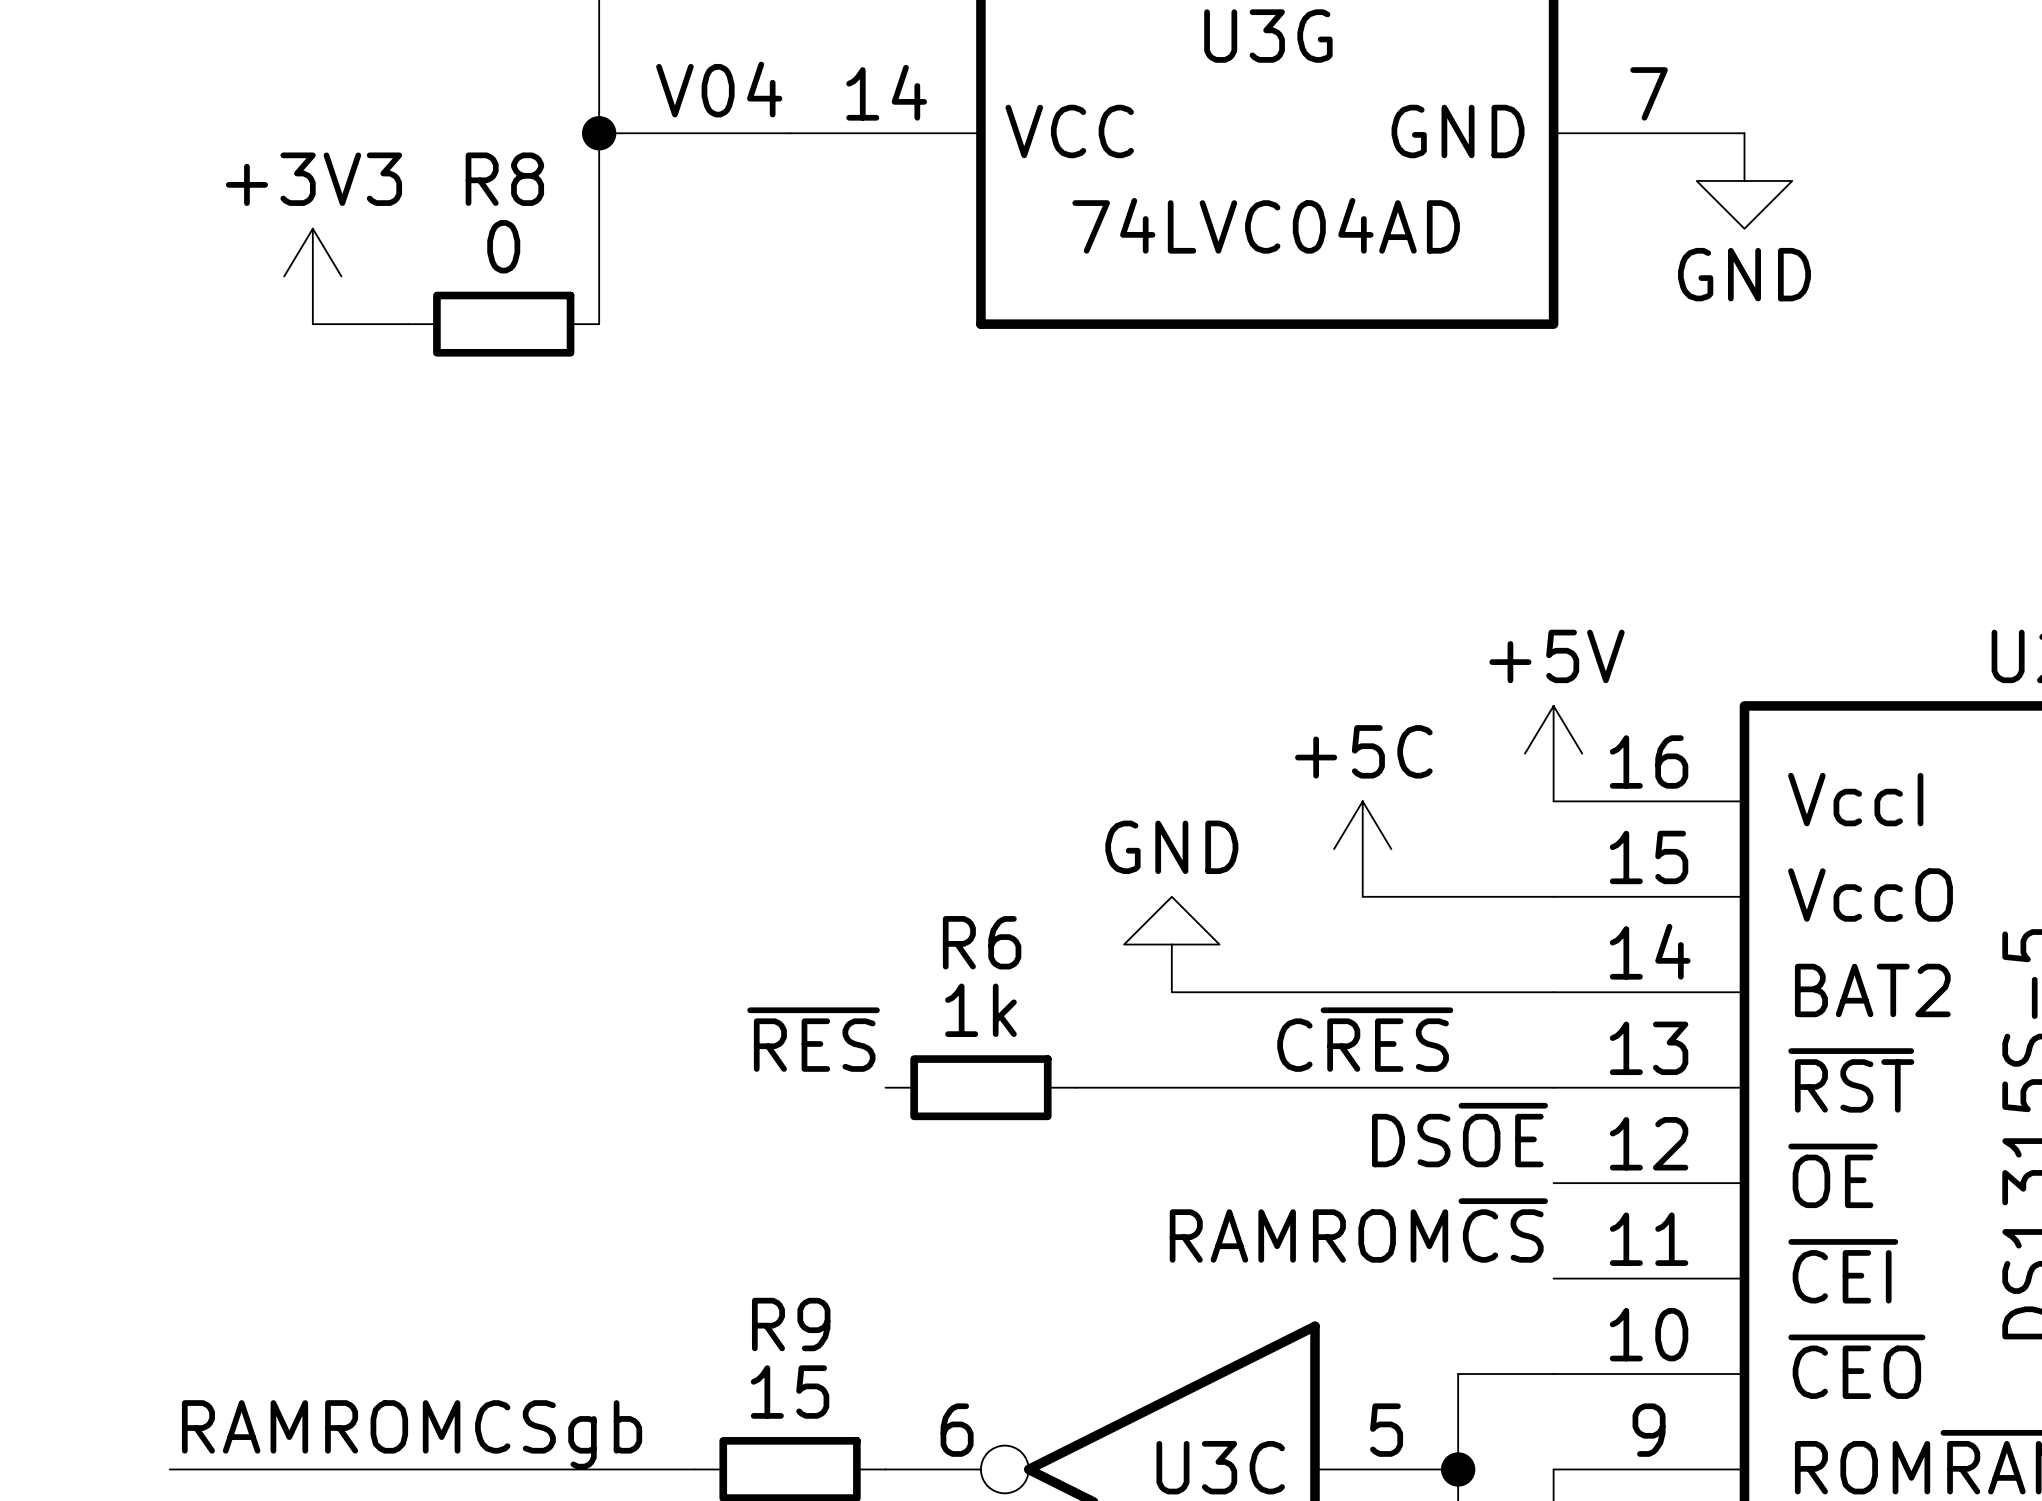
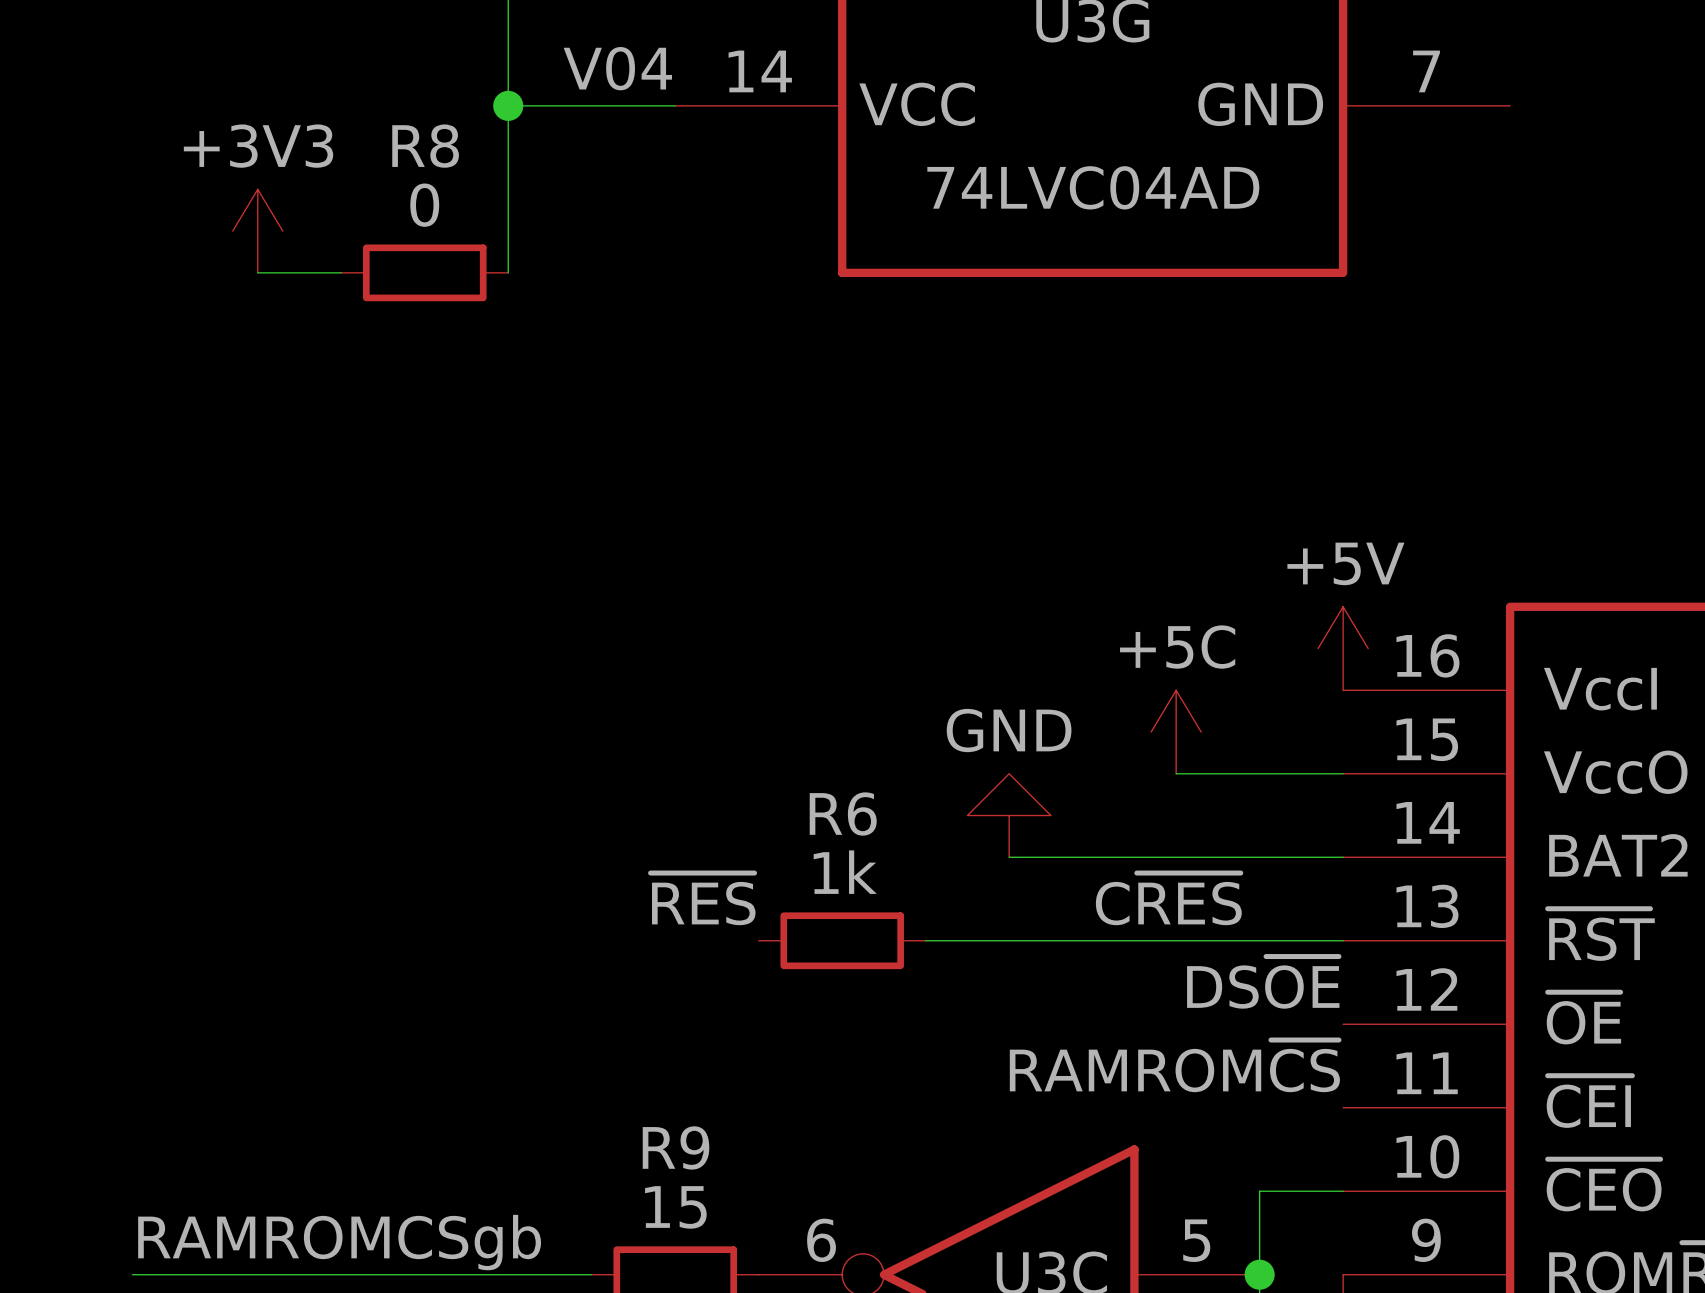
power symbol: GND (1744, 180) -> none

